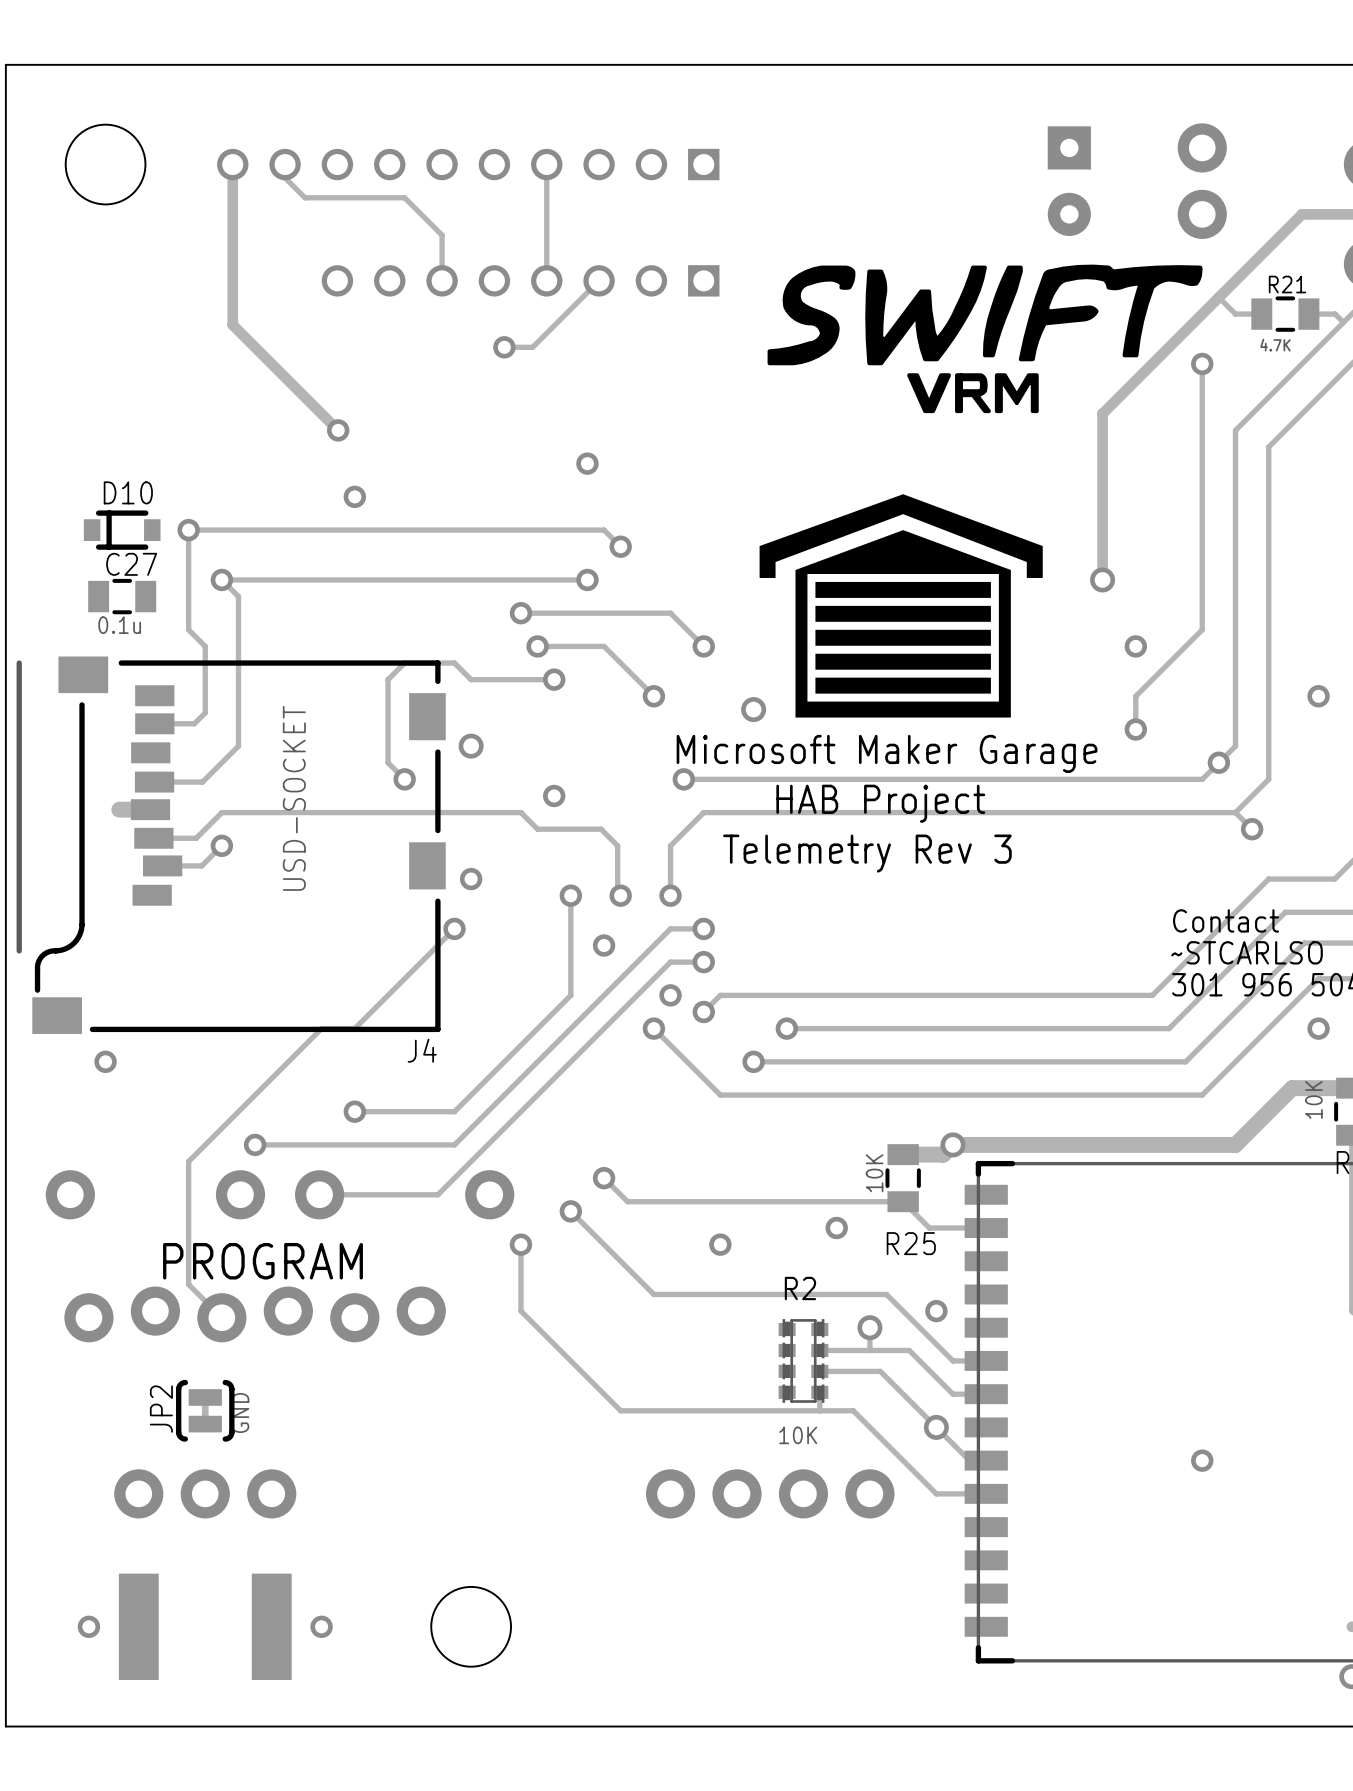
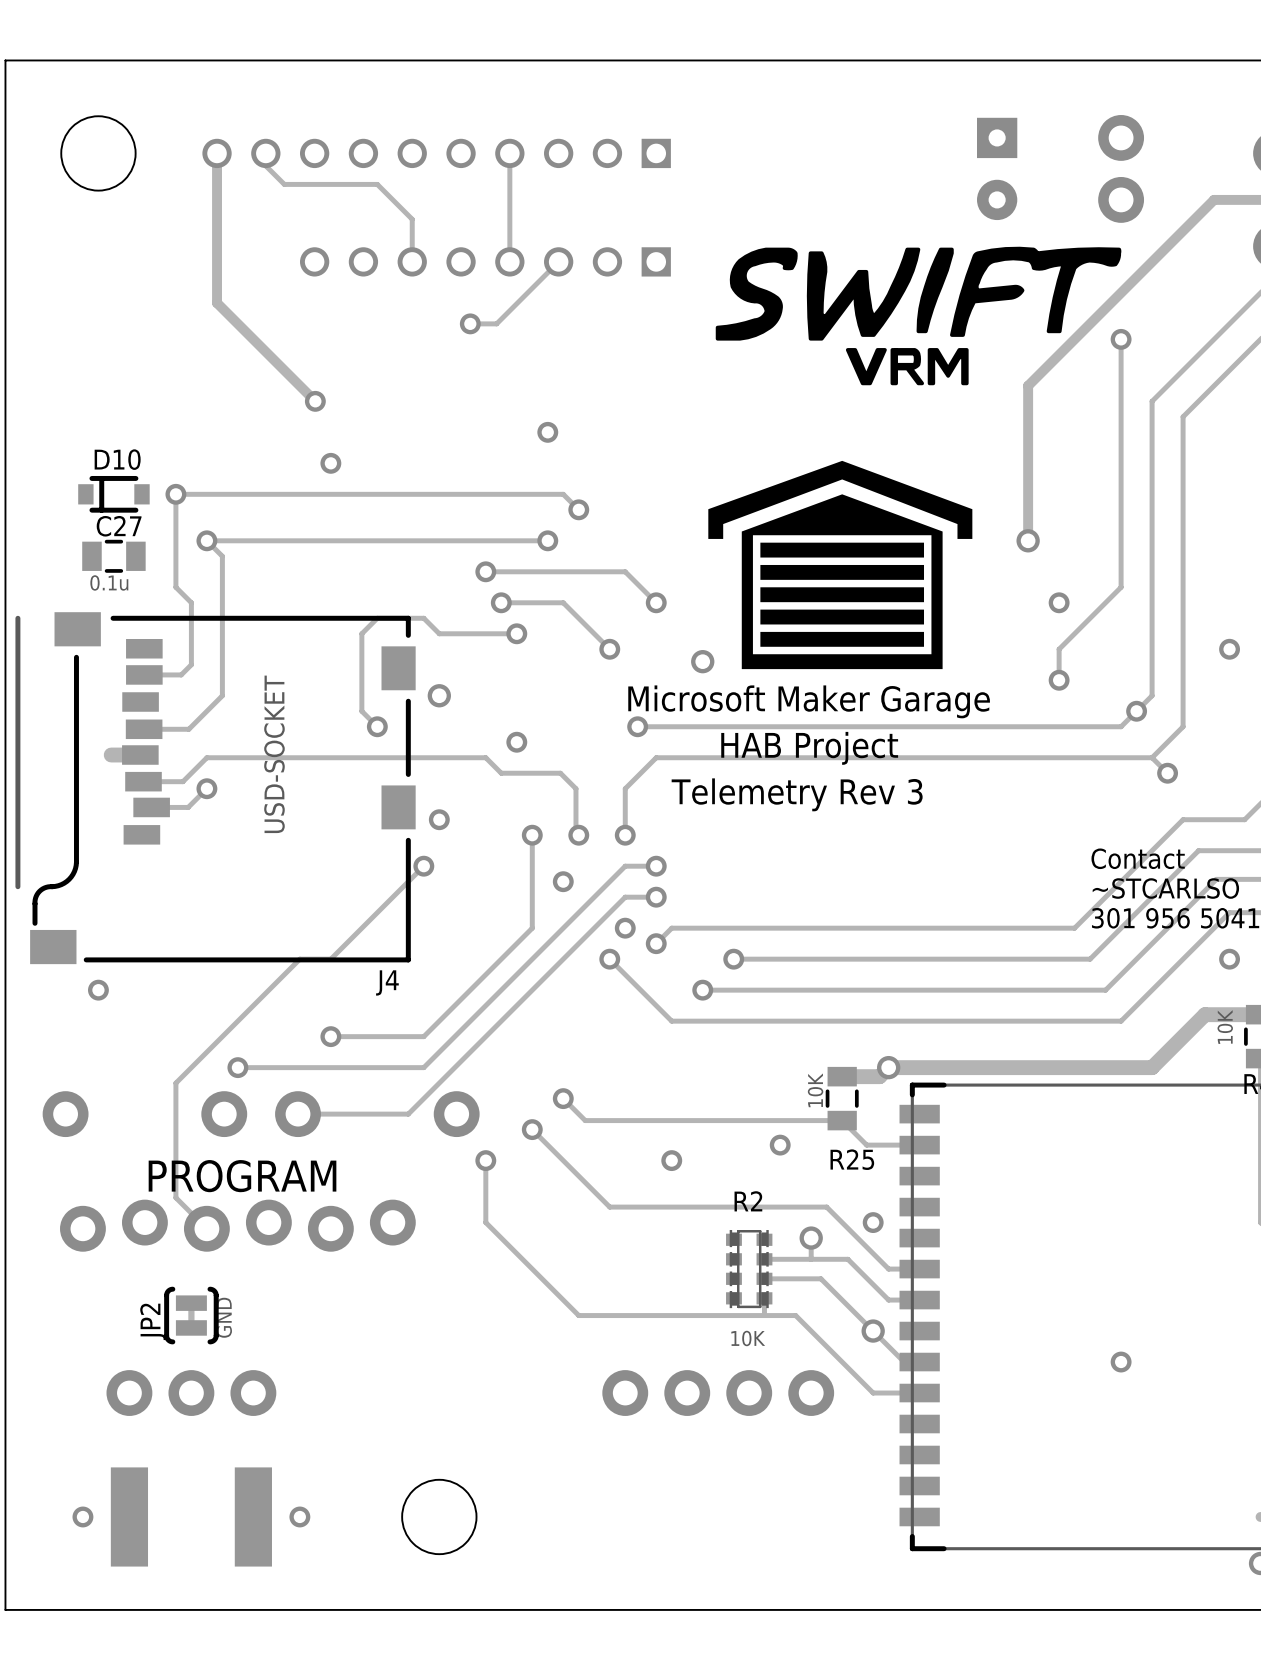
track: (1218, 297) (1235, 314) (1261, 314) -> none
R21: 4.7K (1285, 314) -> none
track: (1308, 314) (1335, 314) (1343, 322) -> none

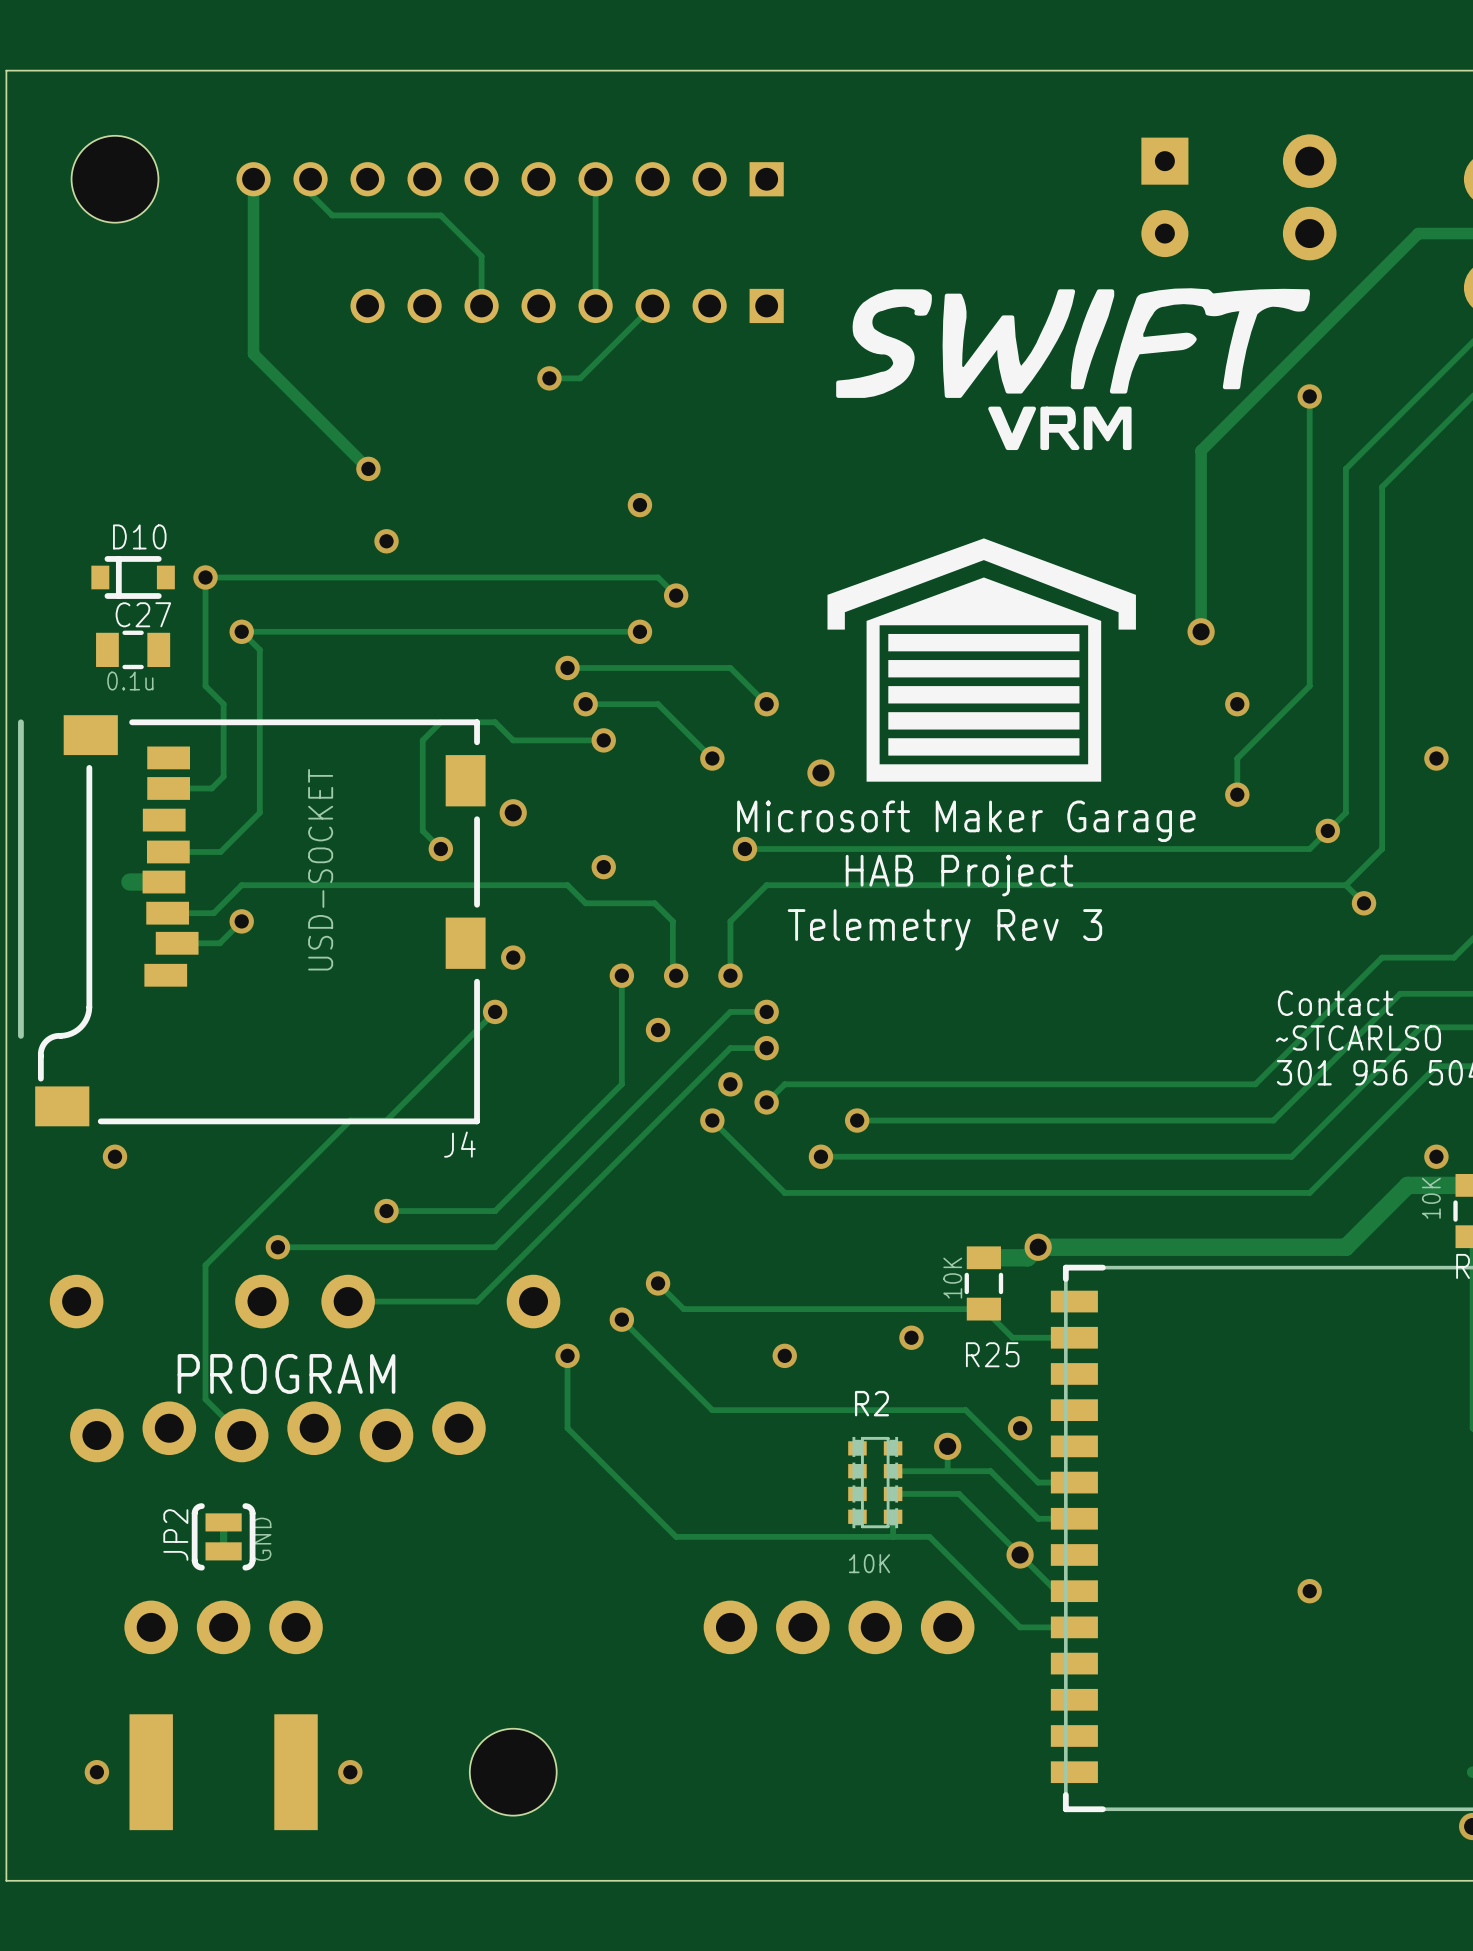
via position: (1229, 959) -> (1436, 1156)

